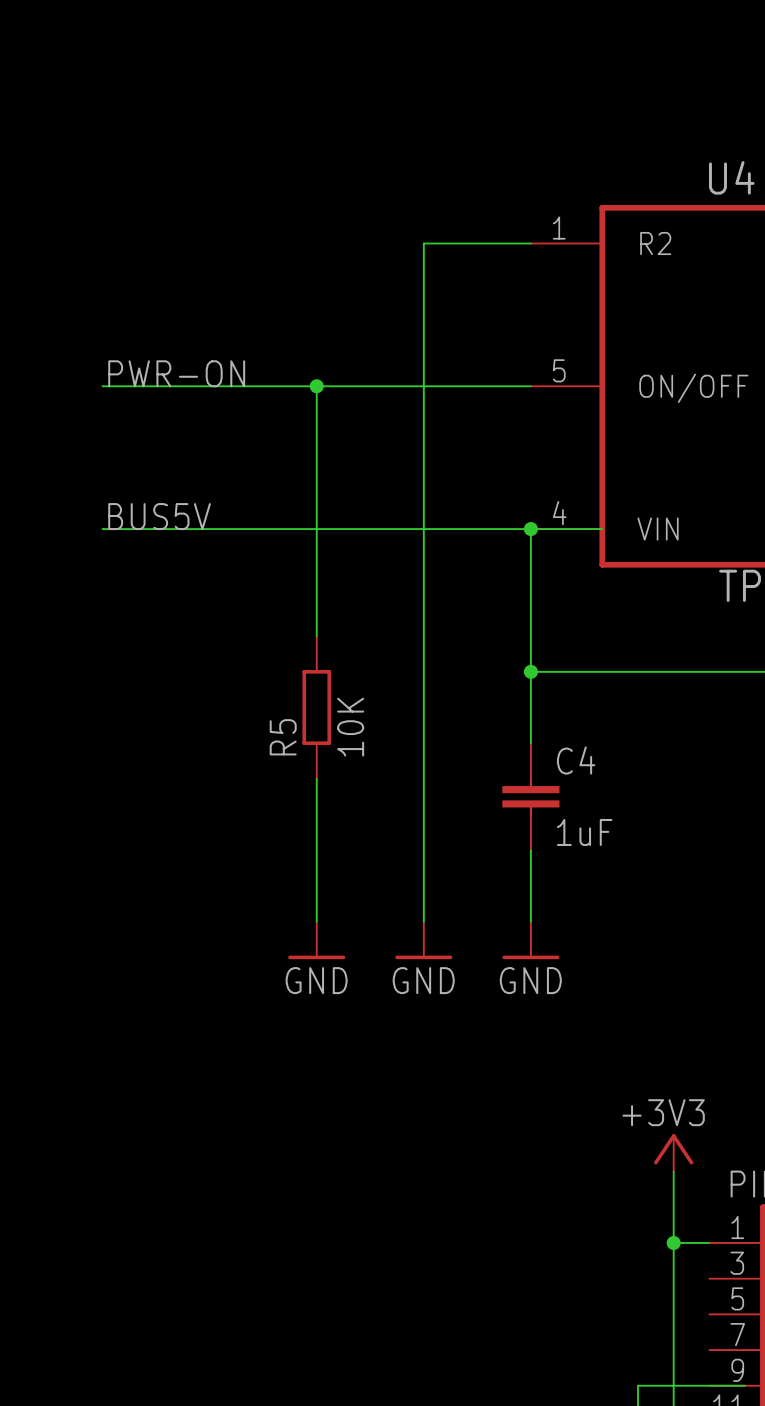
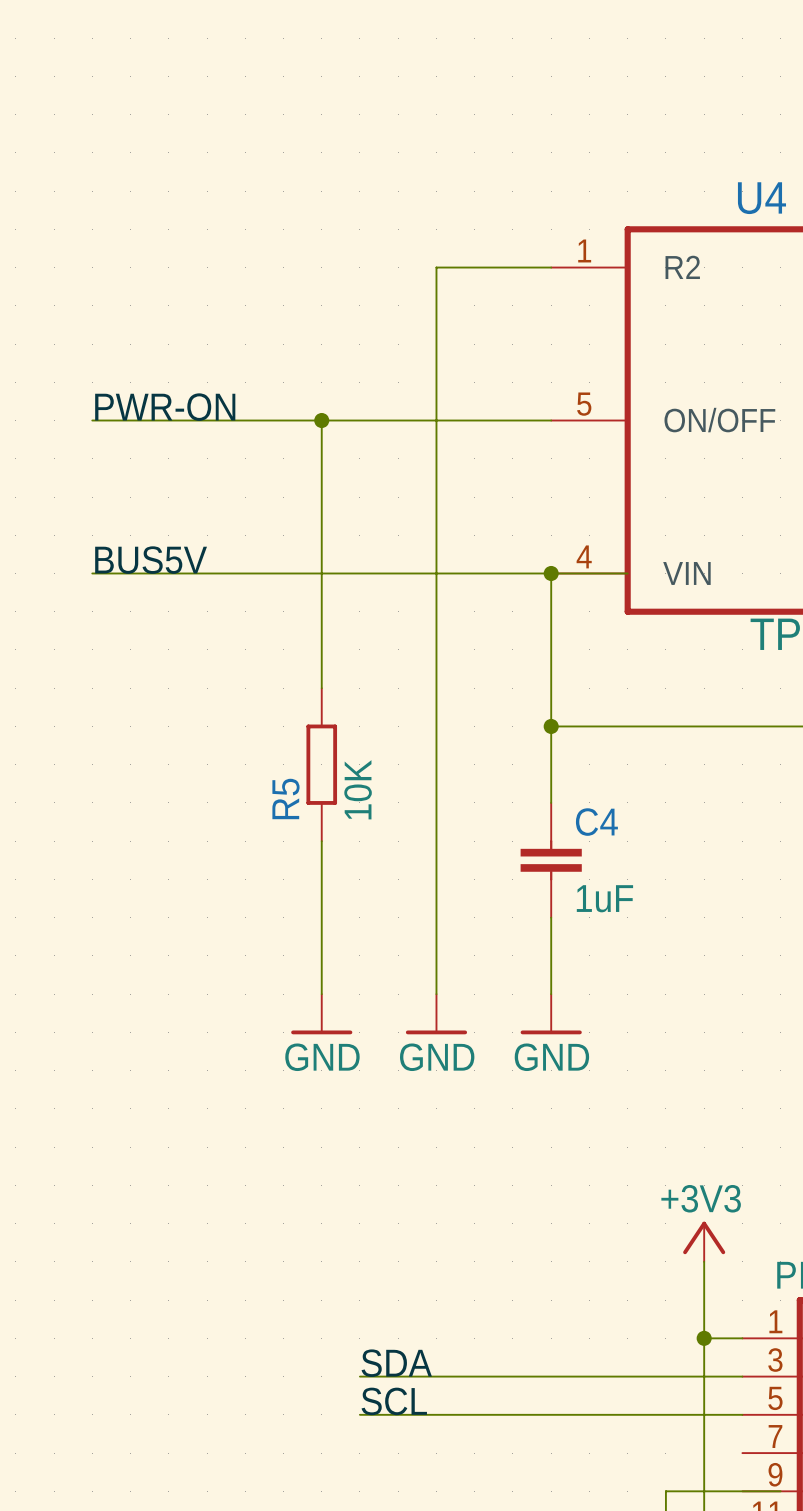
label: none -> SDA (396, 1363)
wire: none -> (359, 1376) (742, 1376)
label: none -> SCL (394, 1401)
wire: none -> (359, 1414) (742, 1414)

